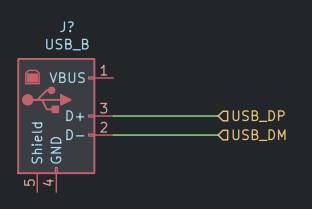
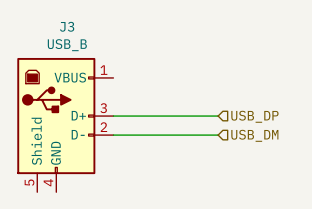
J? name: J? (66, 26) -> J3 (67, 26)

